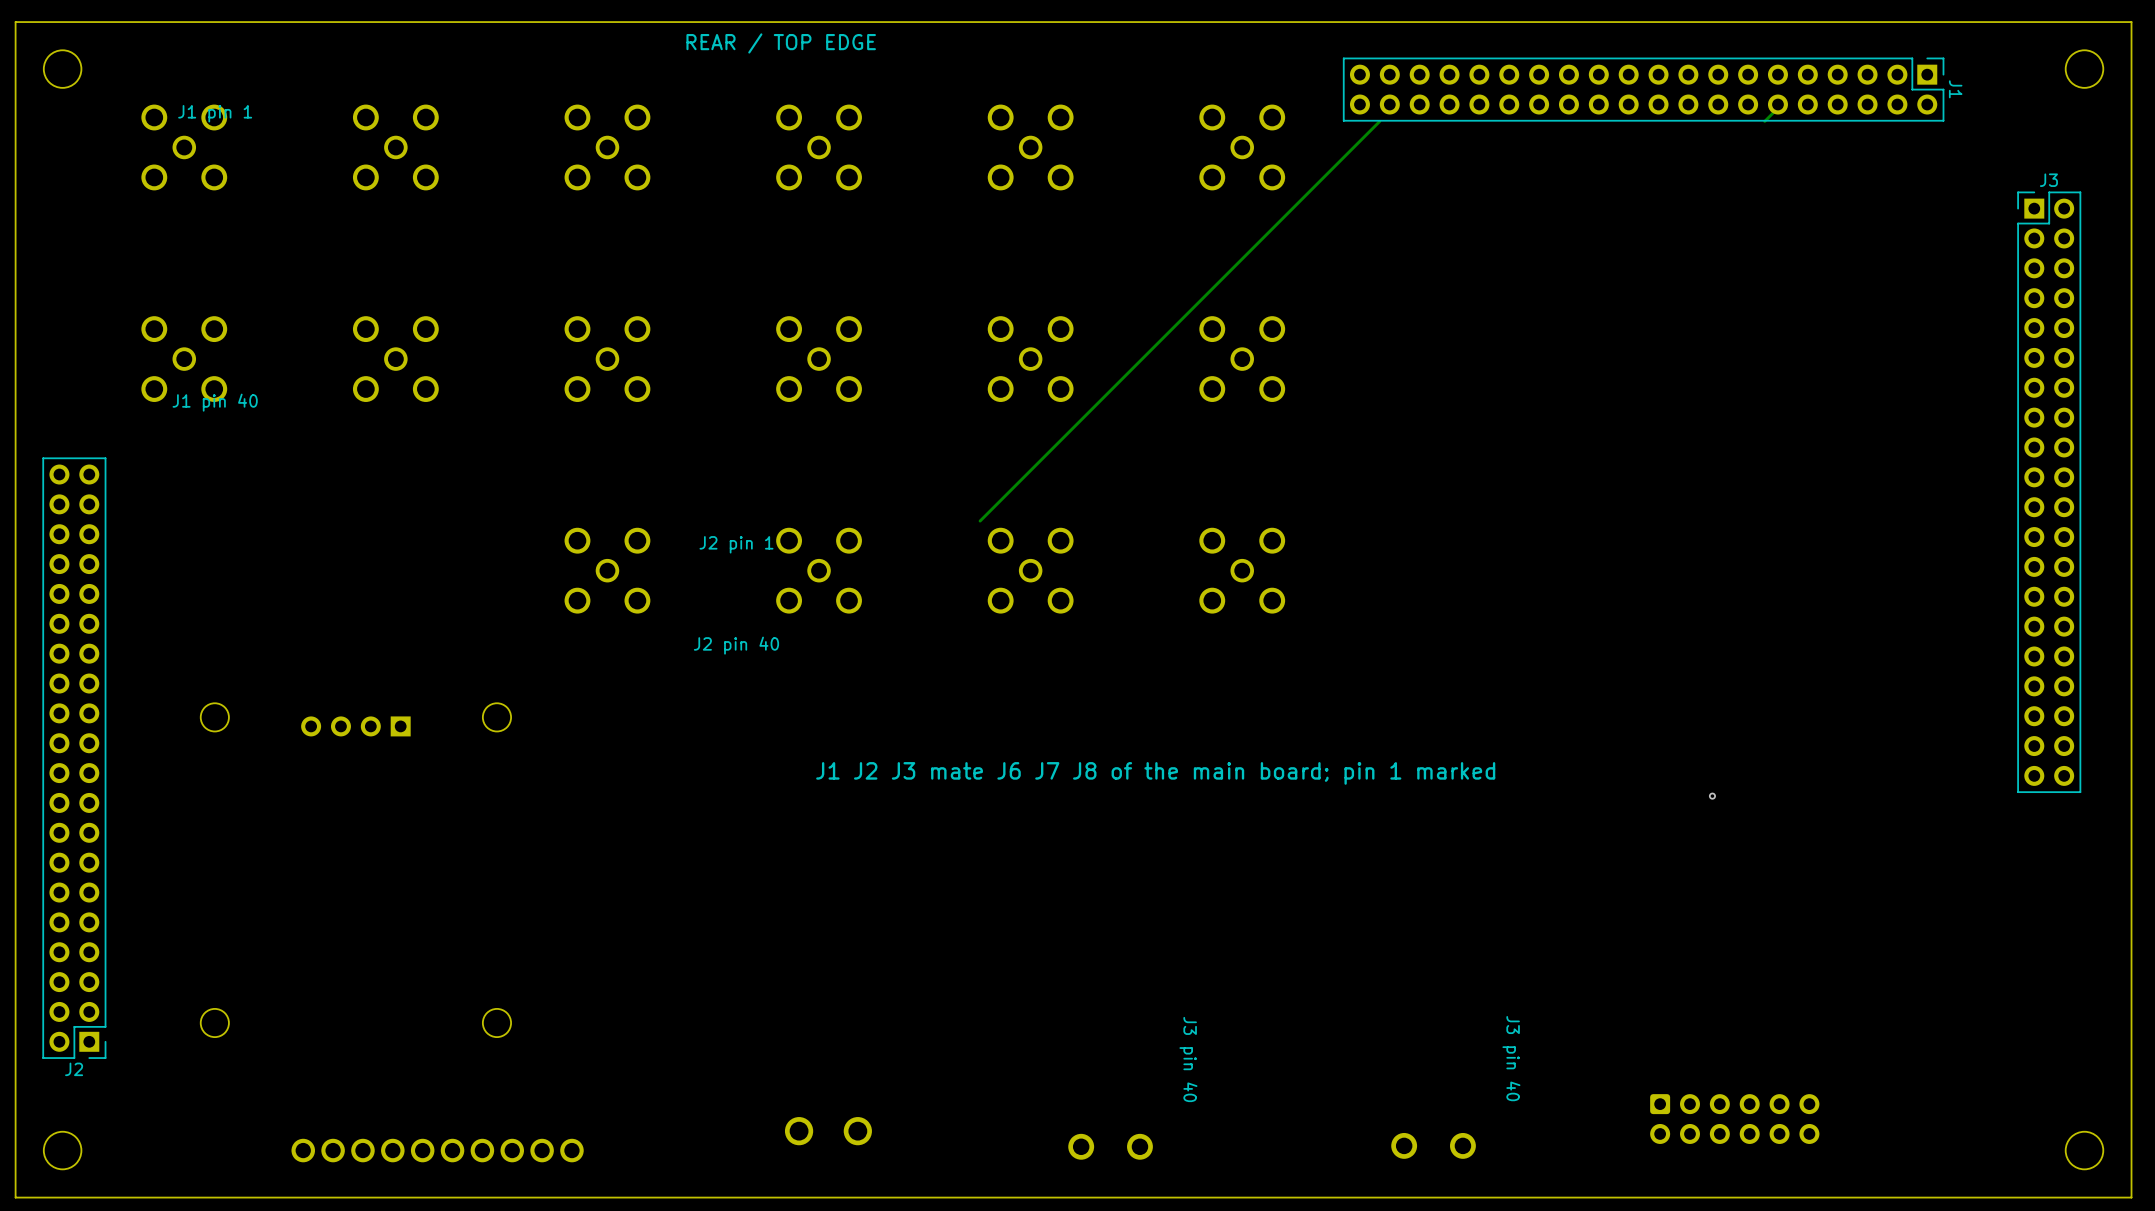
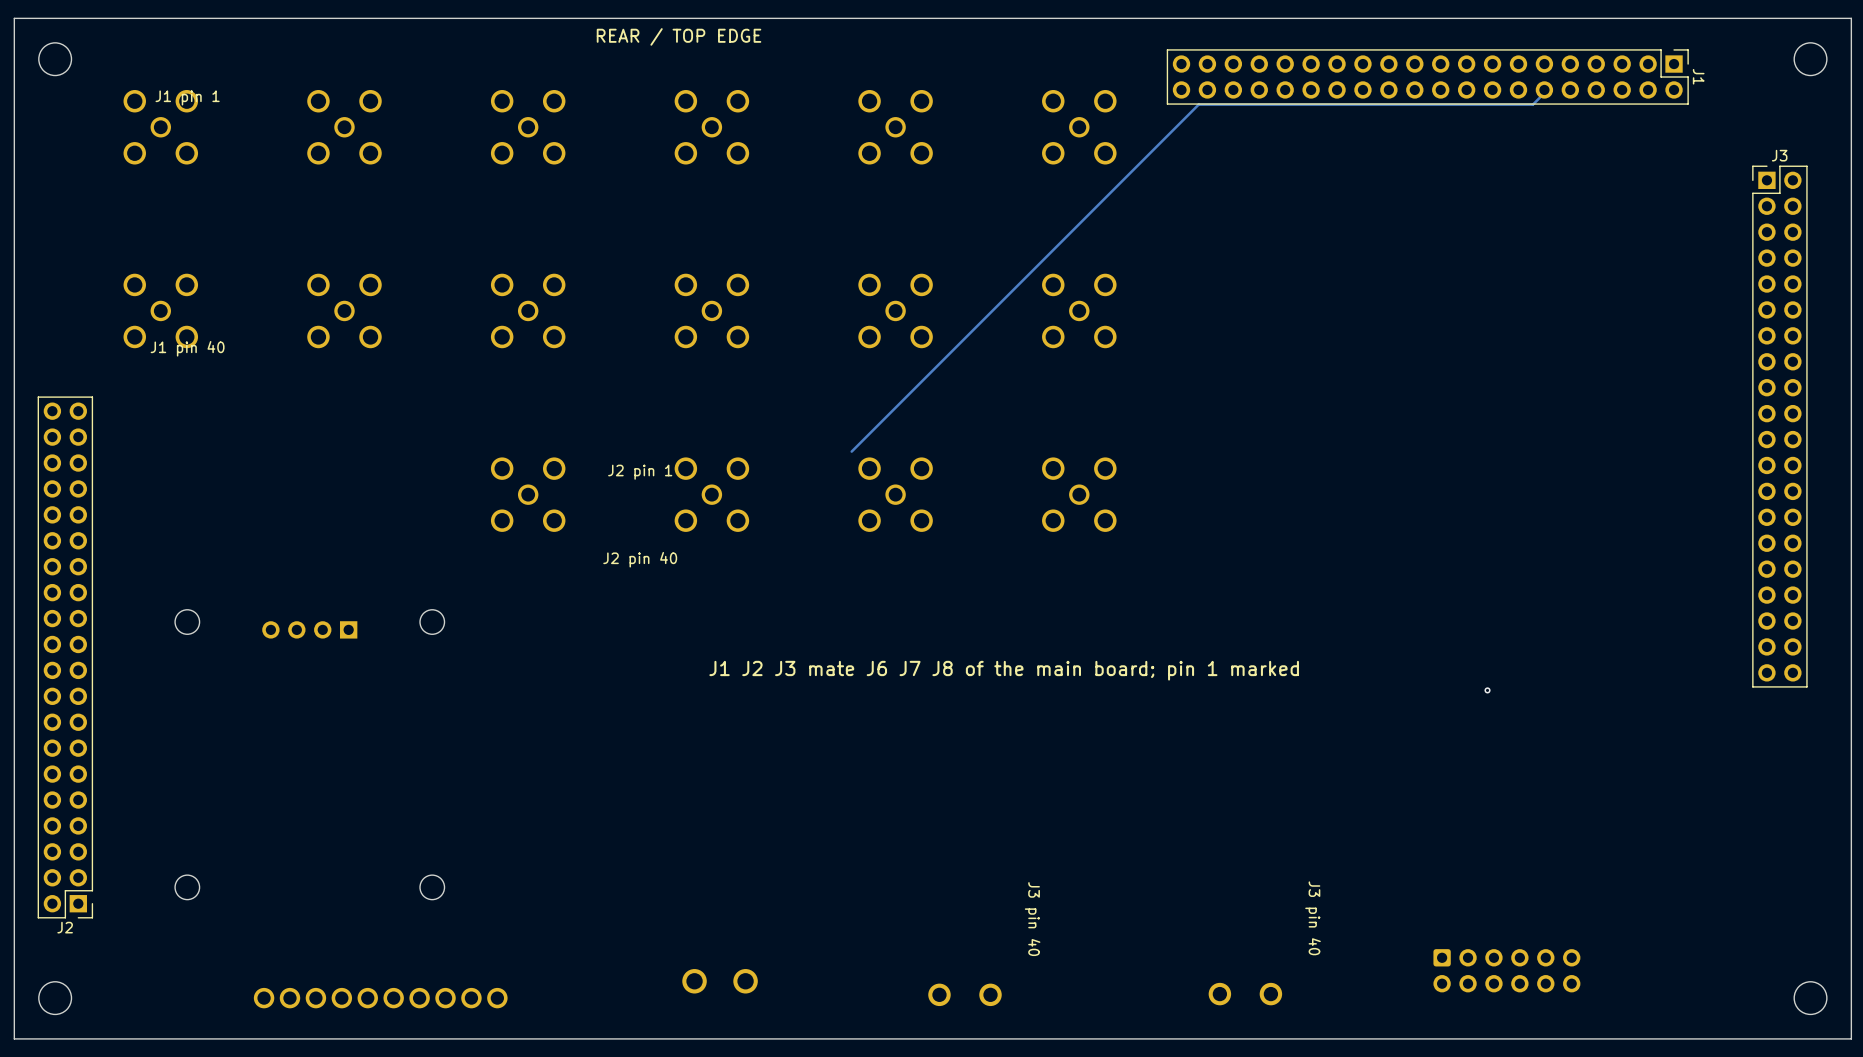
track: none -> (1532, 104) (1198, 104)

